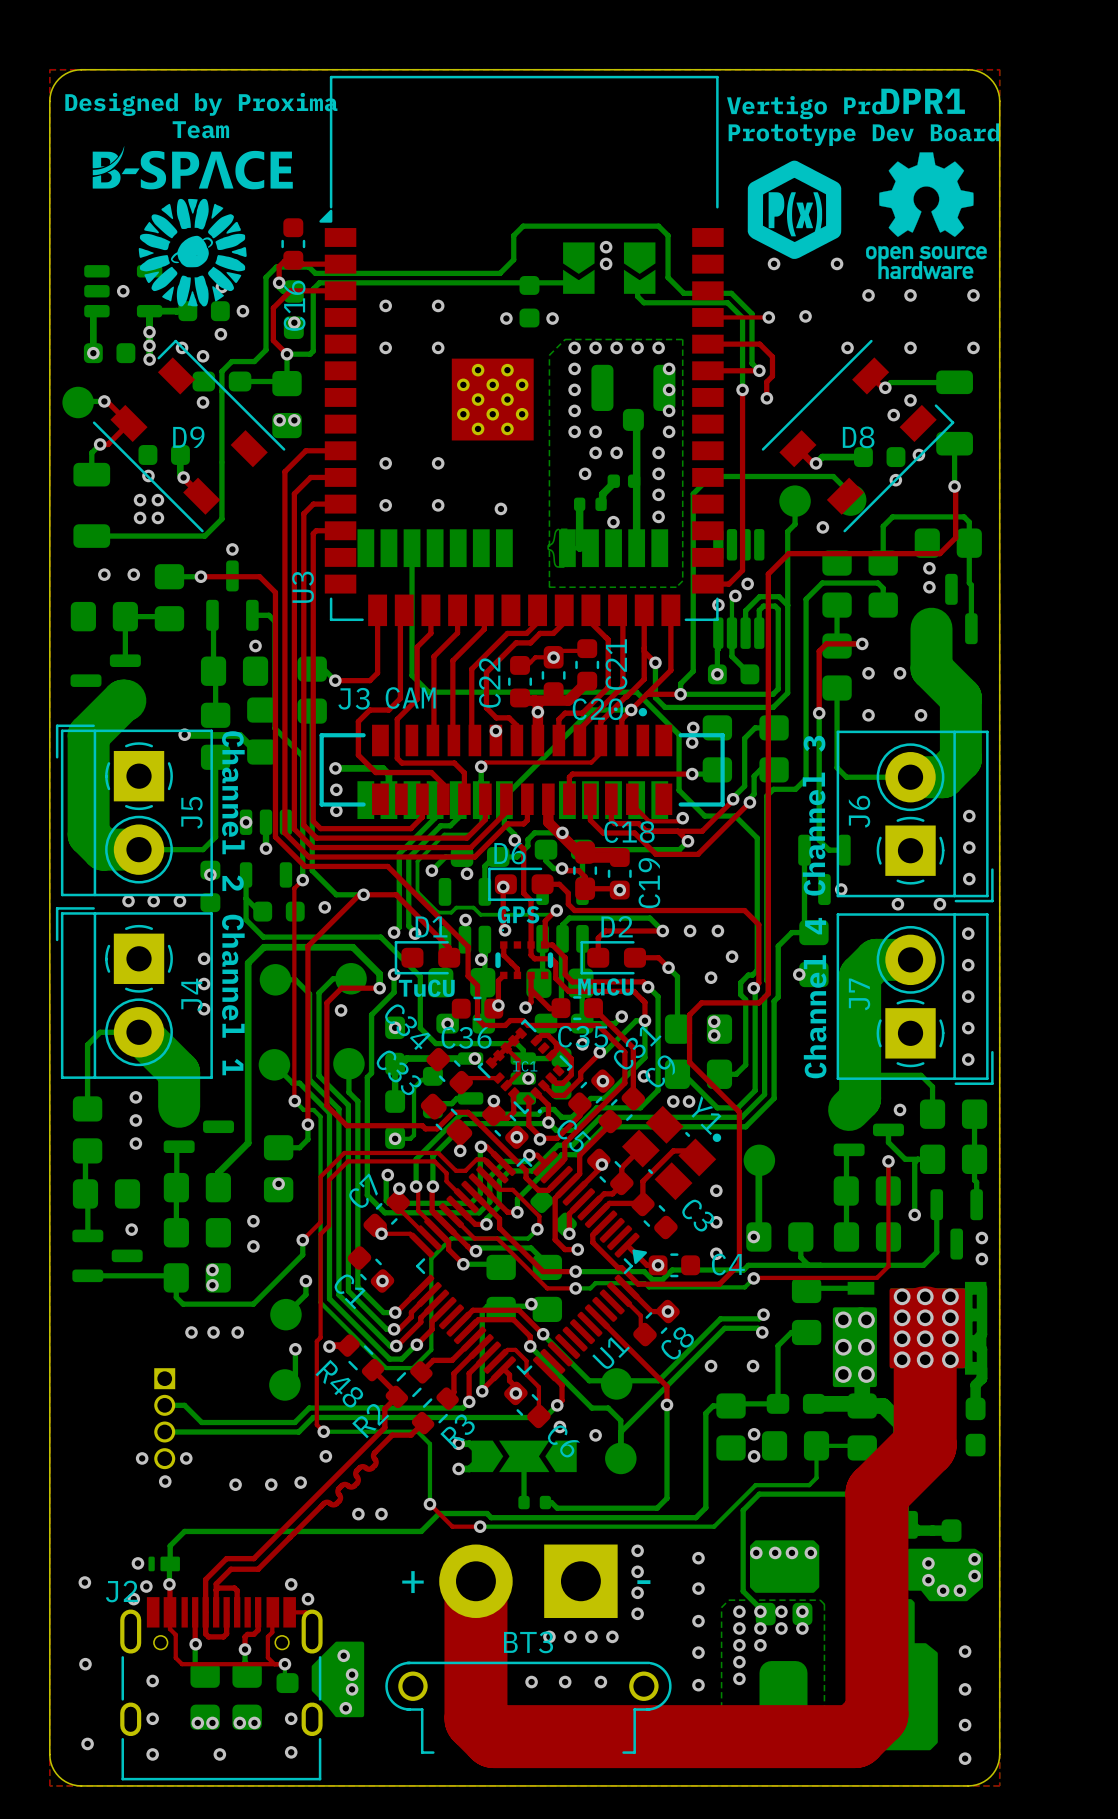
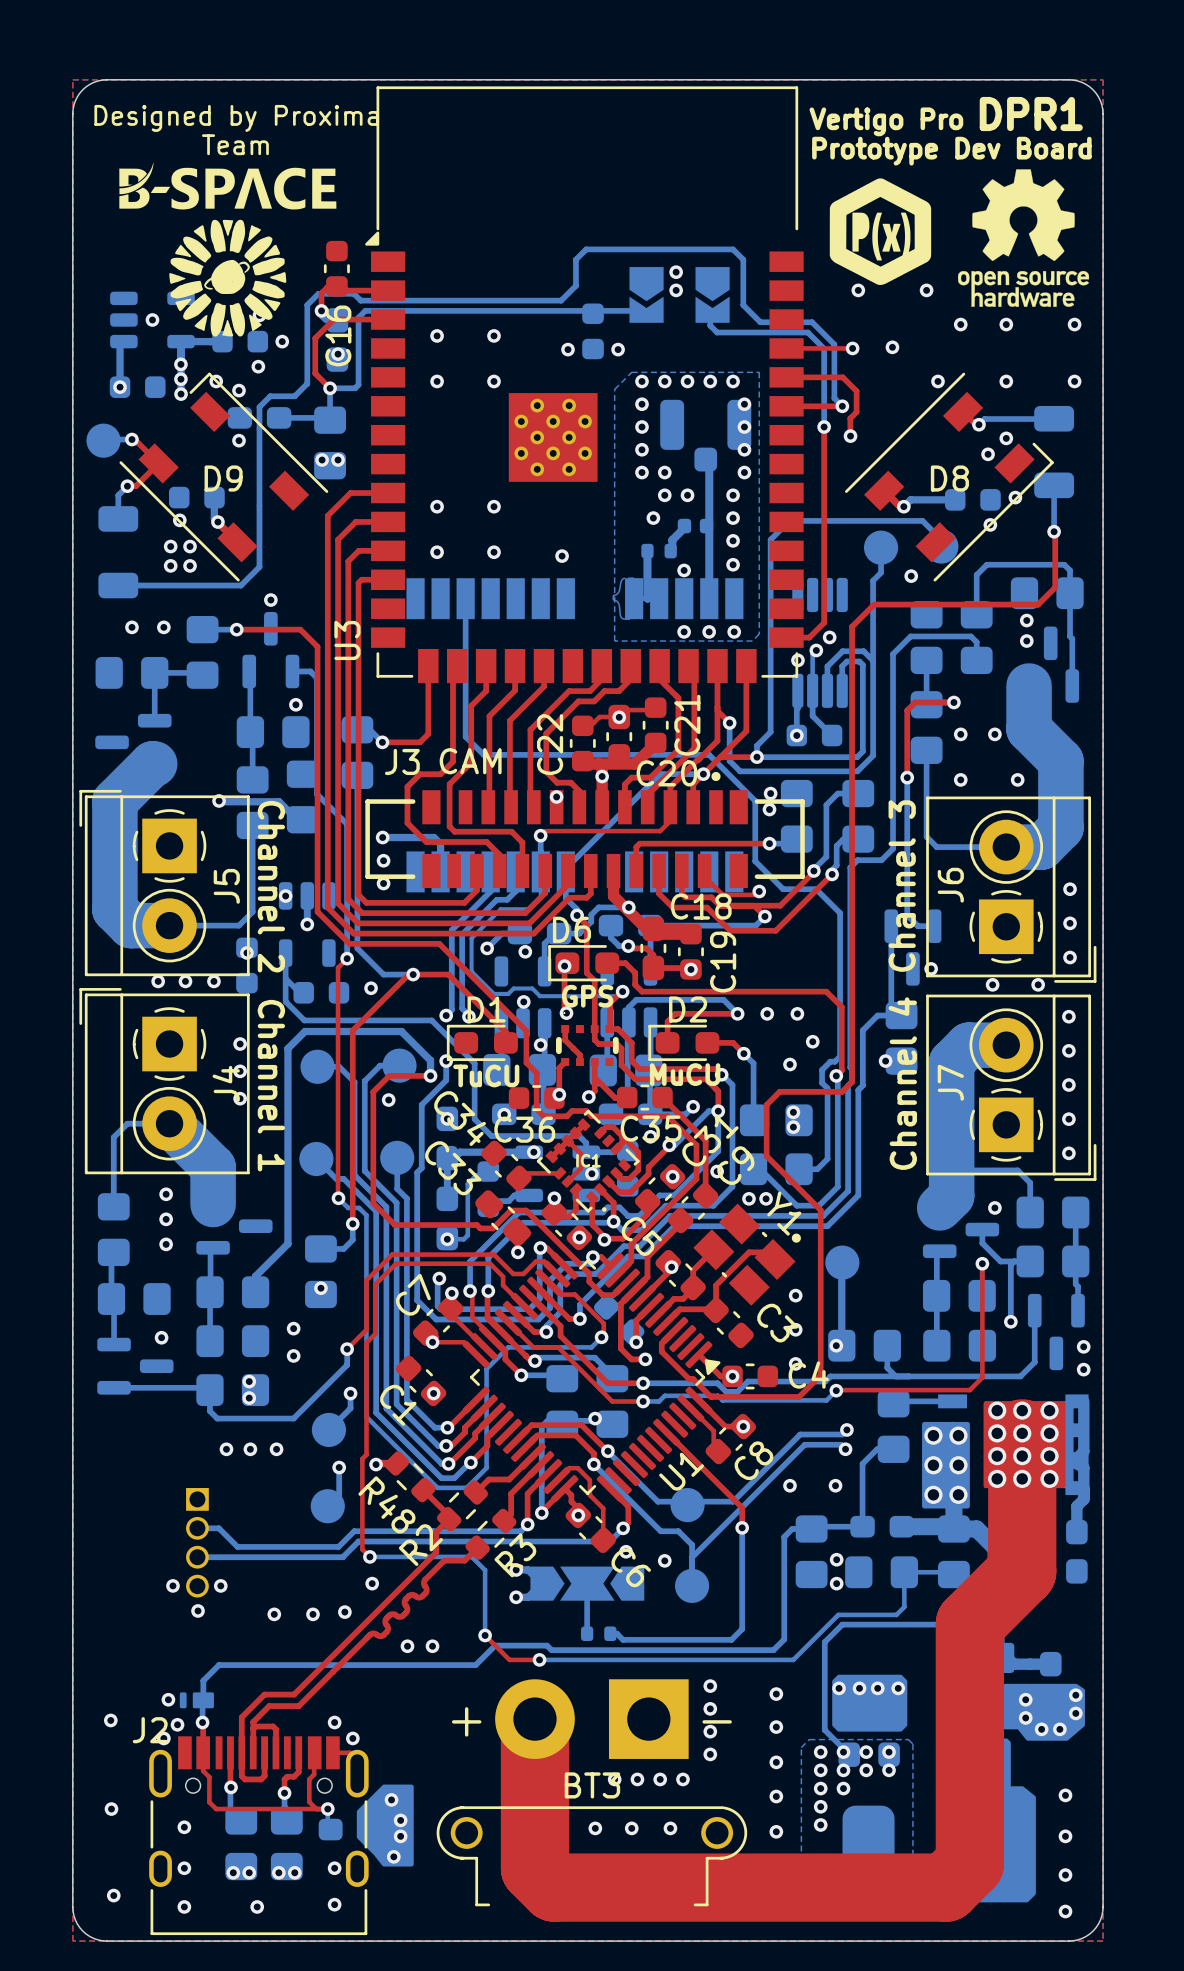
via: none -> (684, 631)
via: none -> (709, 631)
via: none -> (734, 631)

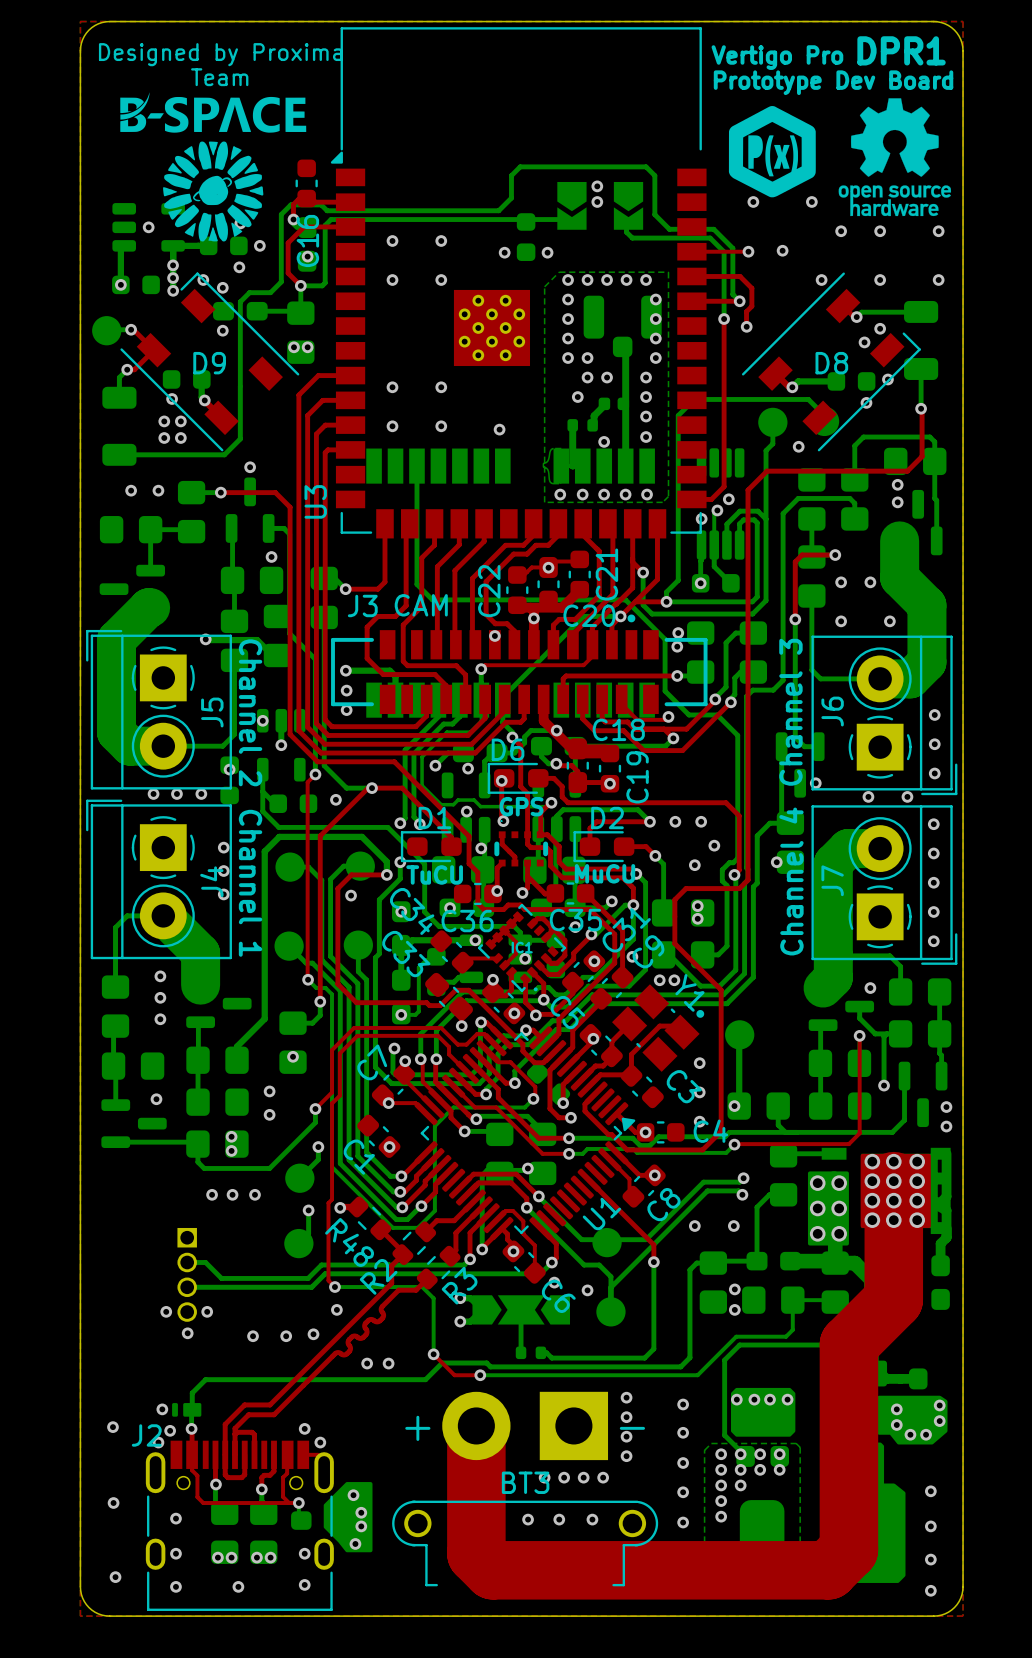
via: none -> (560, 494)
via: none -> (582, 494)

